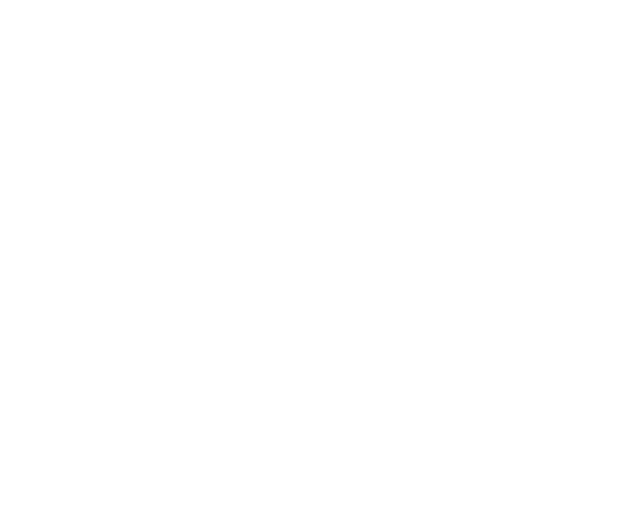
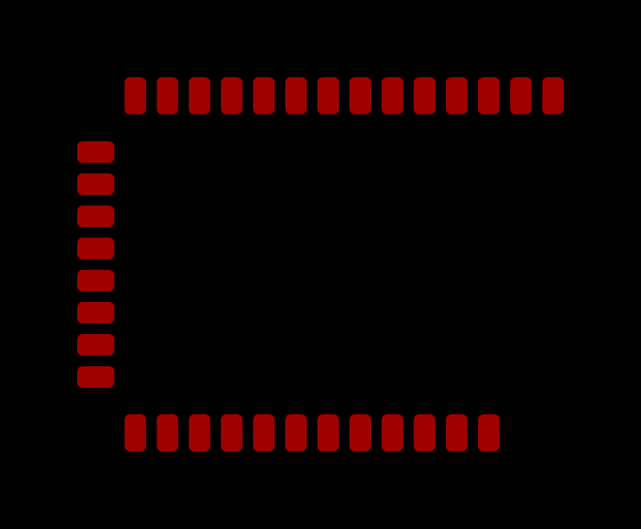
part: none -> (320, 264)

